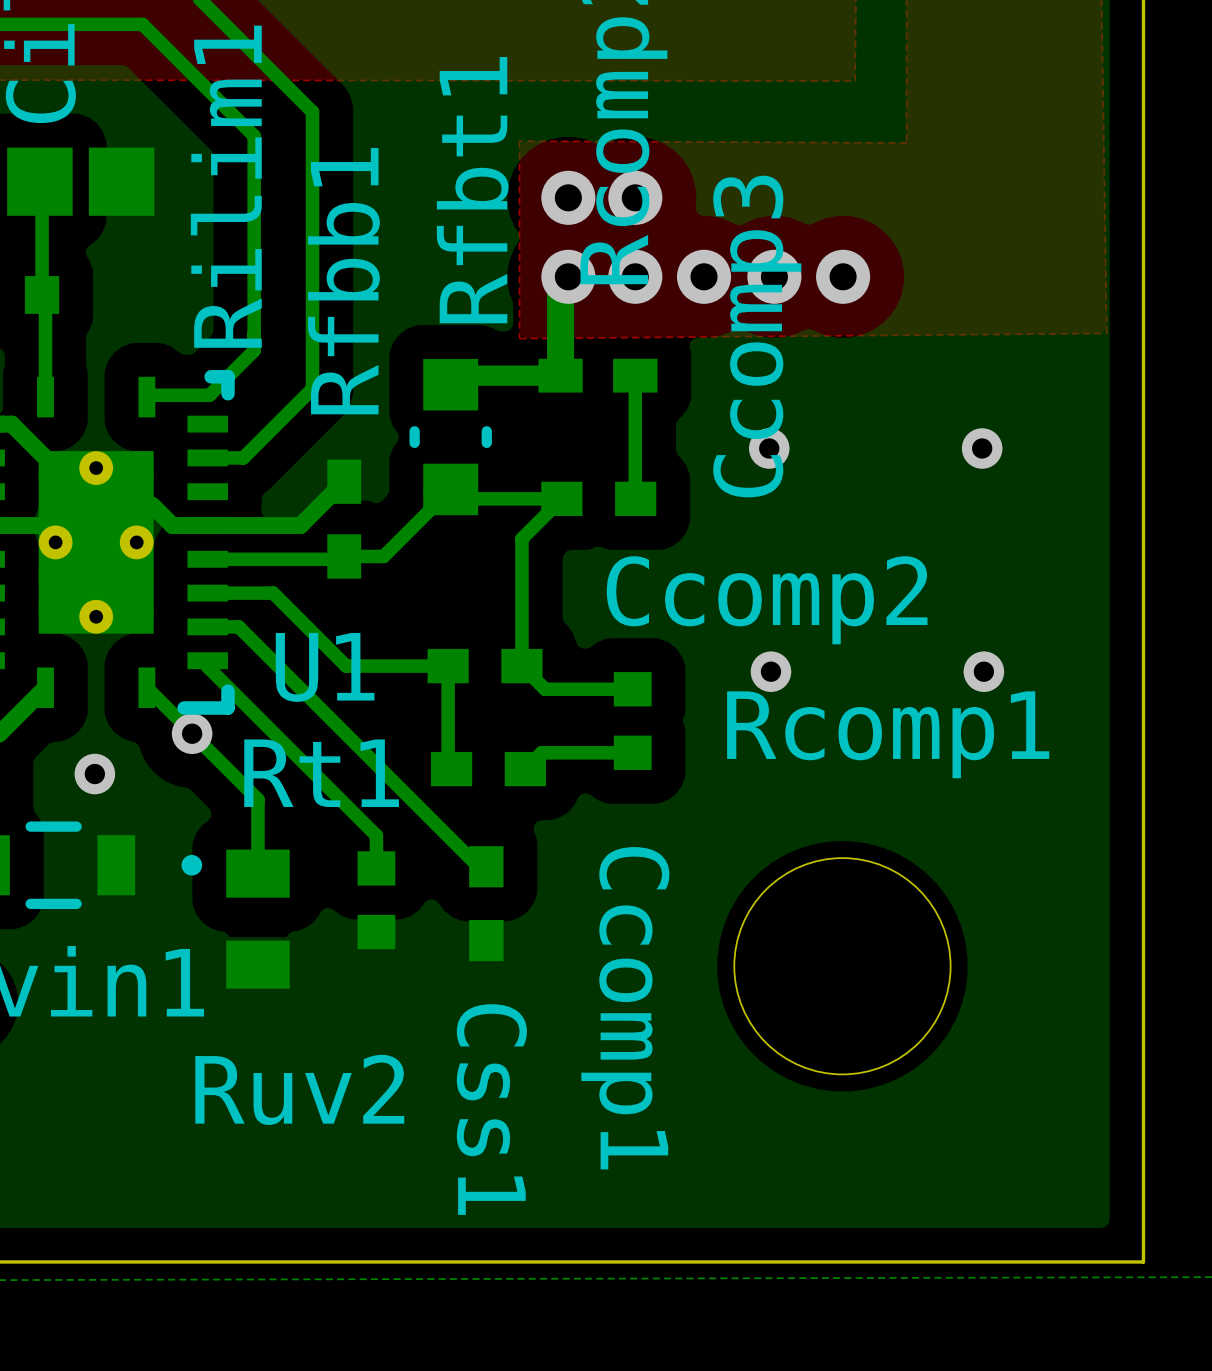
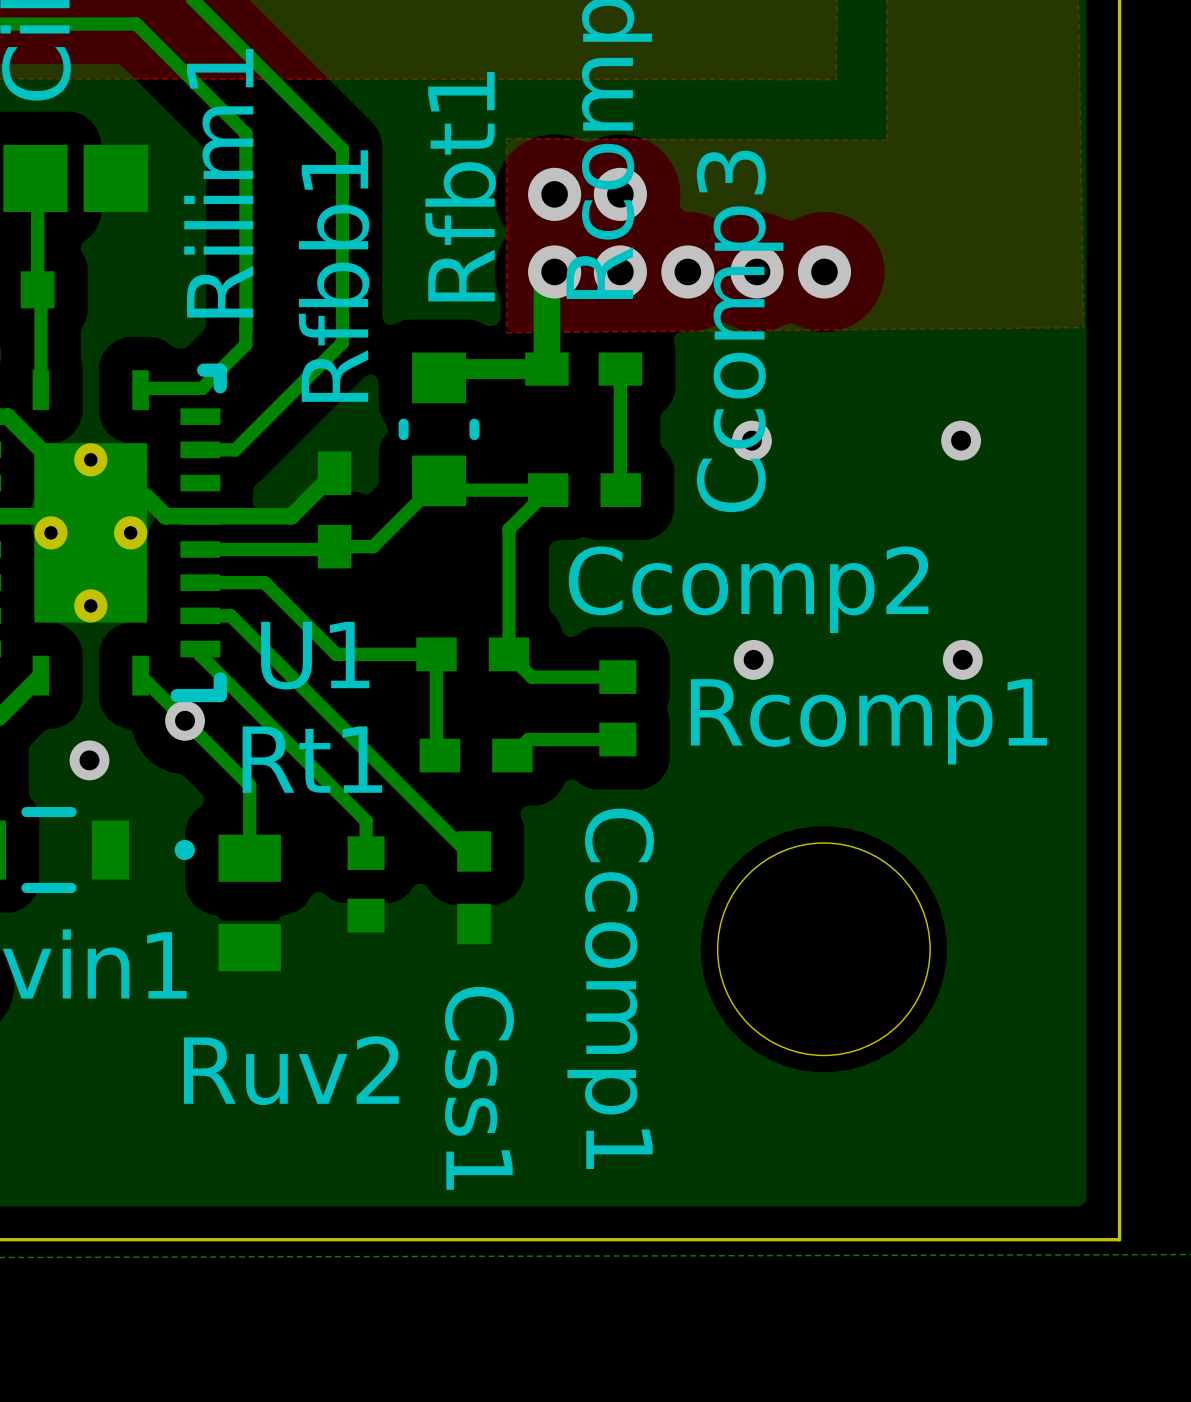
bottom track: (312, 111) (312, 388) -> (303, 110) (342, 149) (342, 342) (303, 381)

